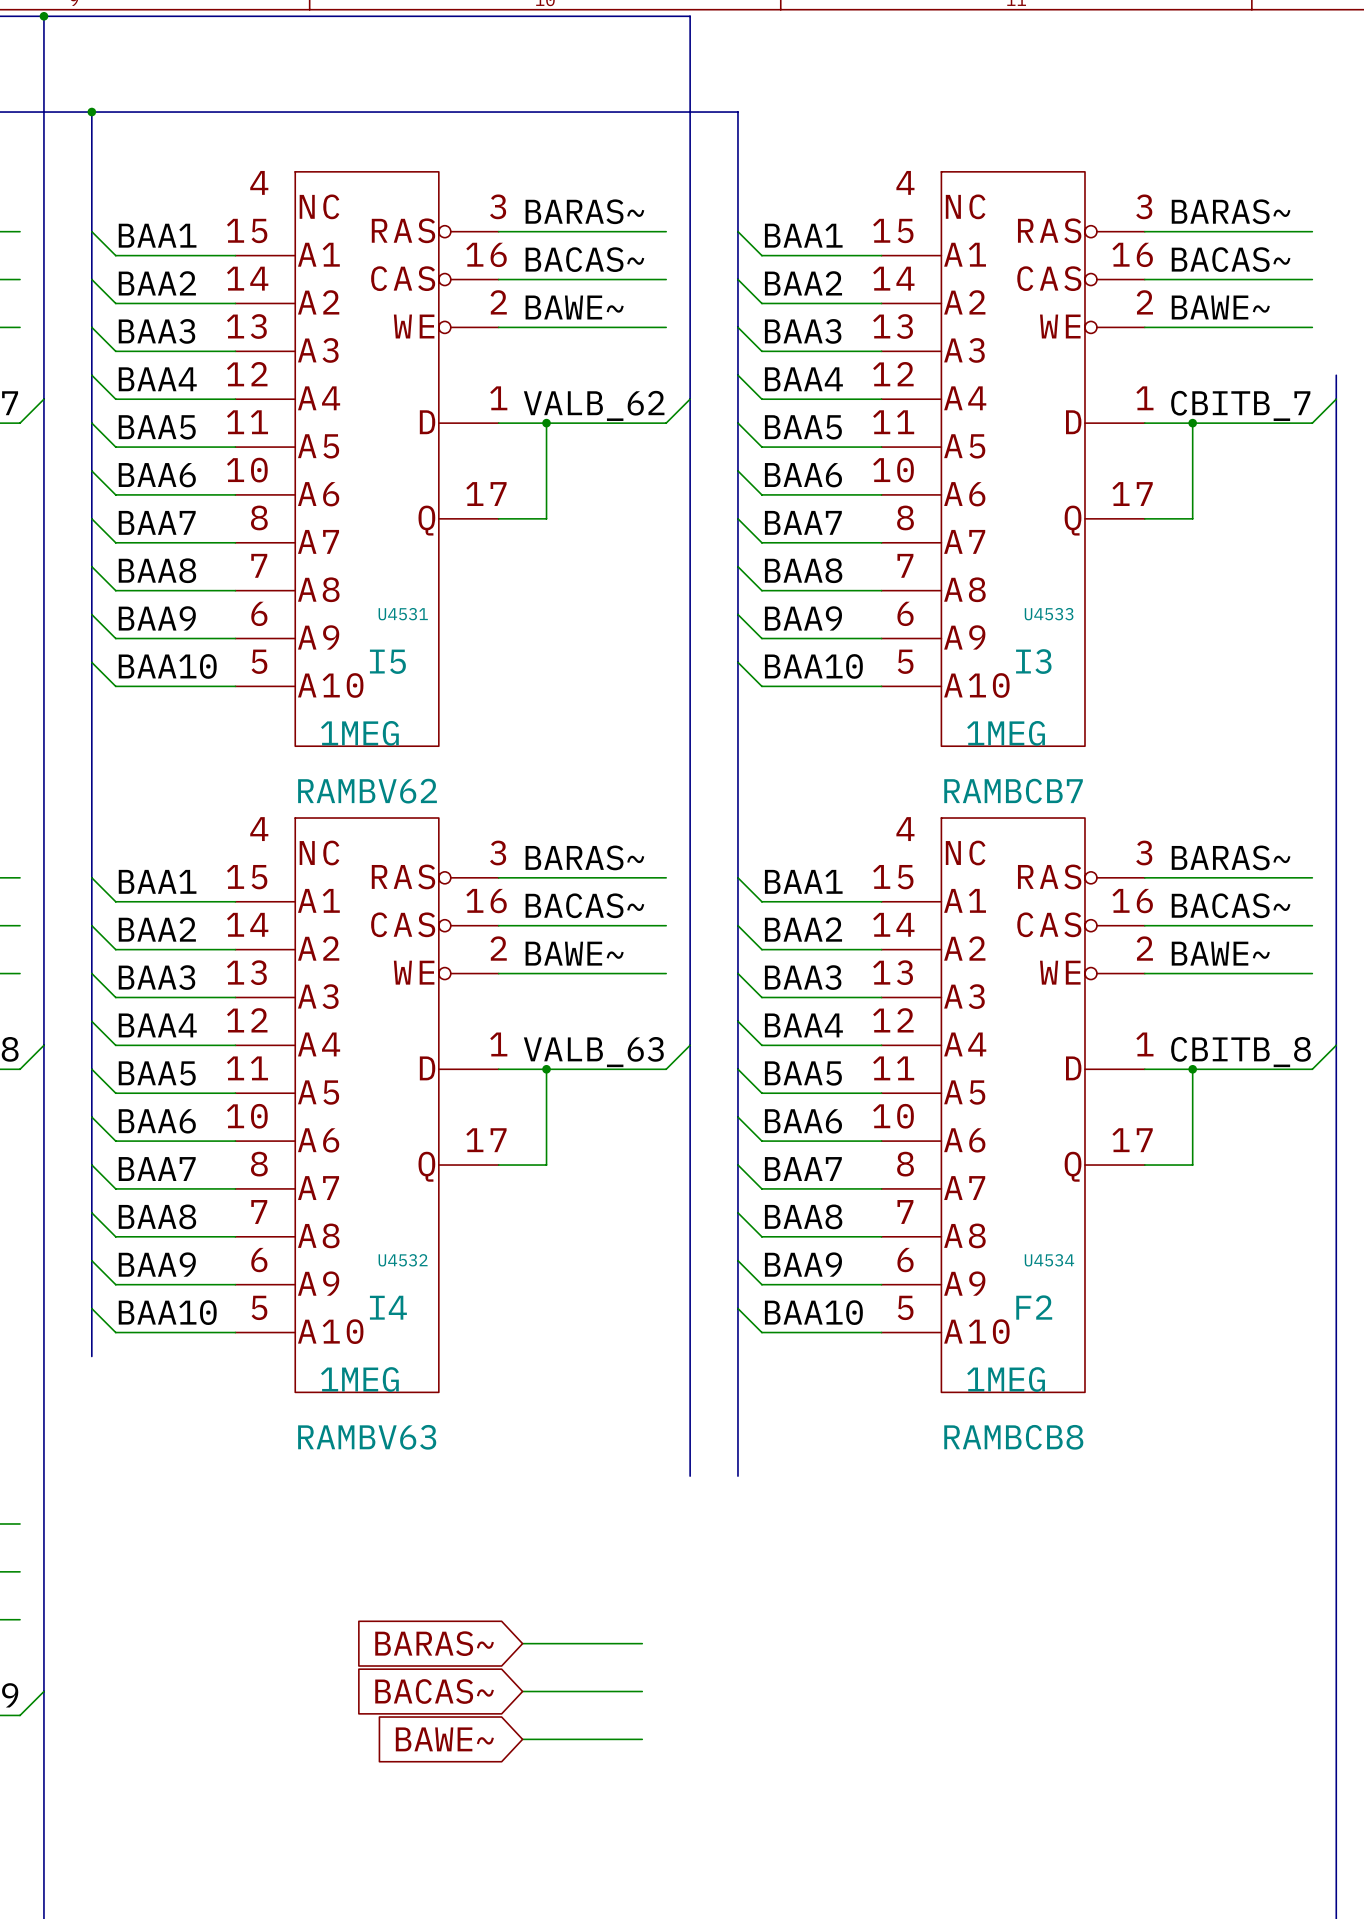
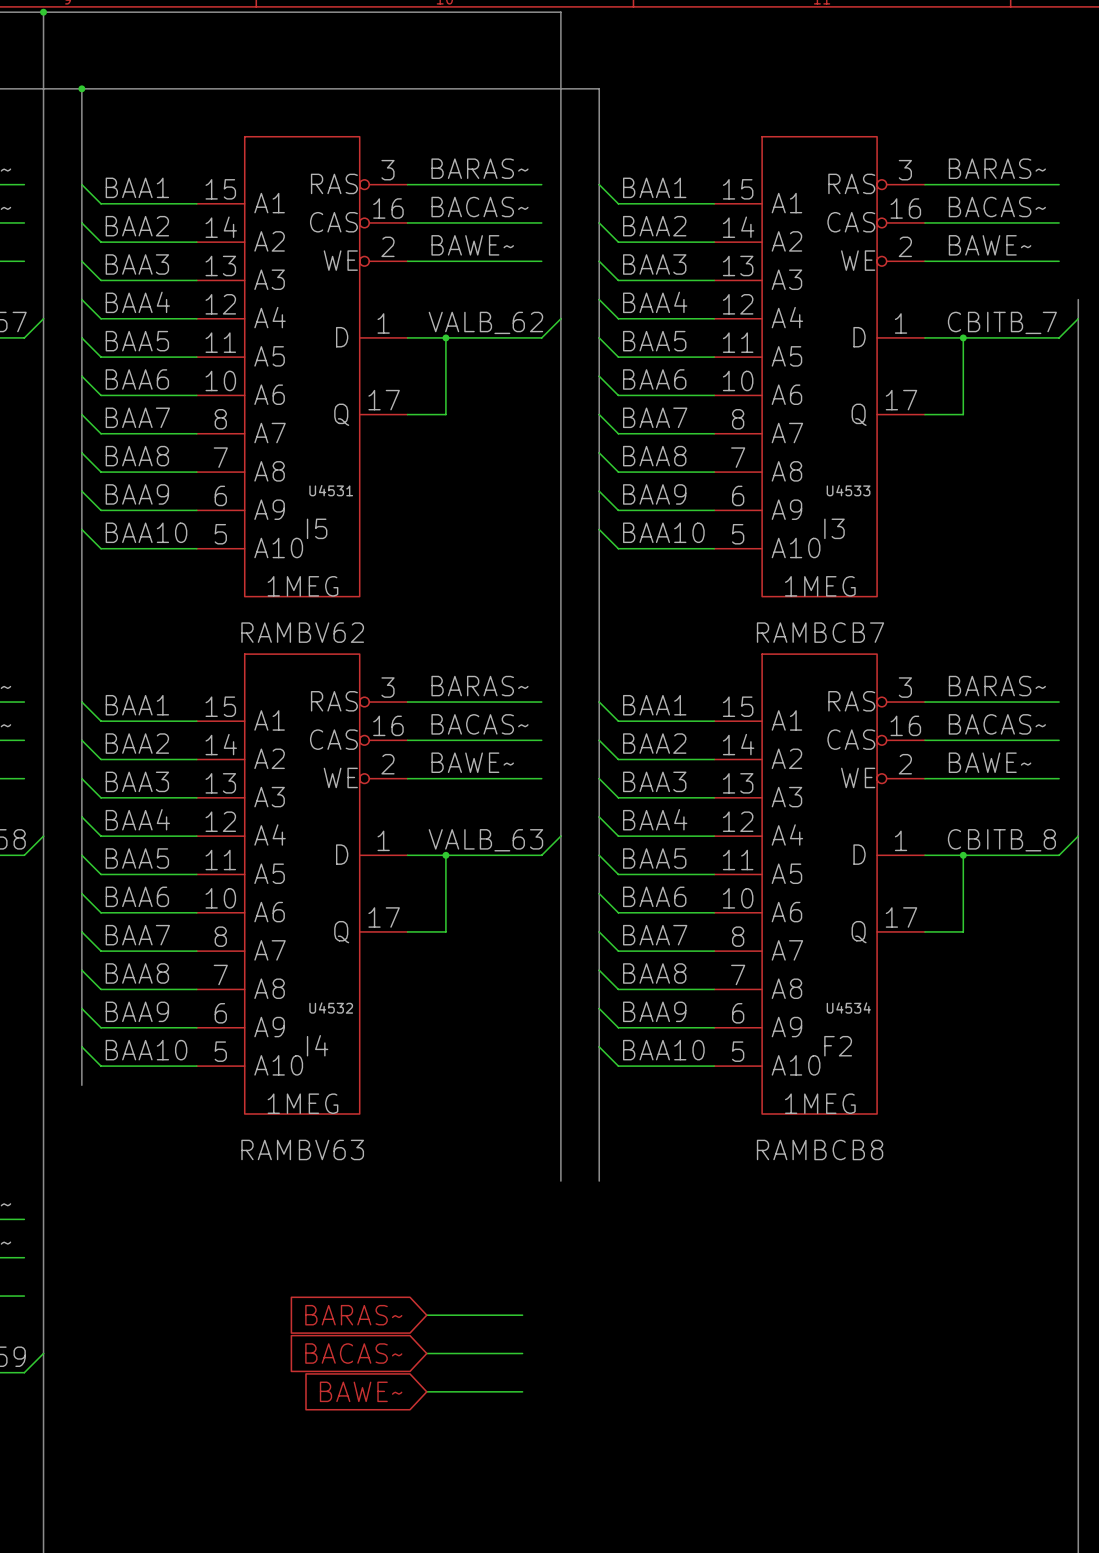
U4531 symbol: [235, 171, 499, 747] -> [196, 136, 408, 597]
U4533 symbol: [881, 171, 1145, 747] -> [714, 136, 925, 597]
U4532 symbol: [235, 818, 499, 1393] -> [196, 654, 408, 1114]
U4534 symbol: [881, 818, 1145, 1393] -> [714, 654, 925, 1114]

